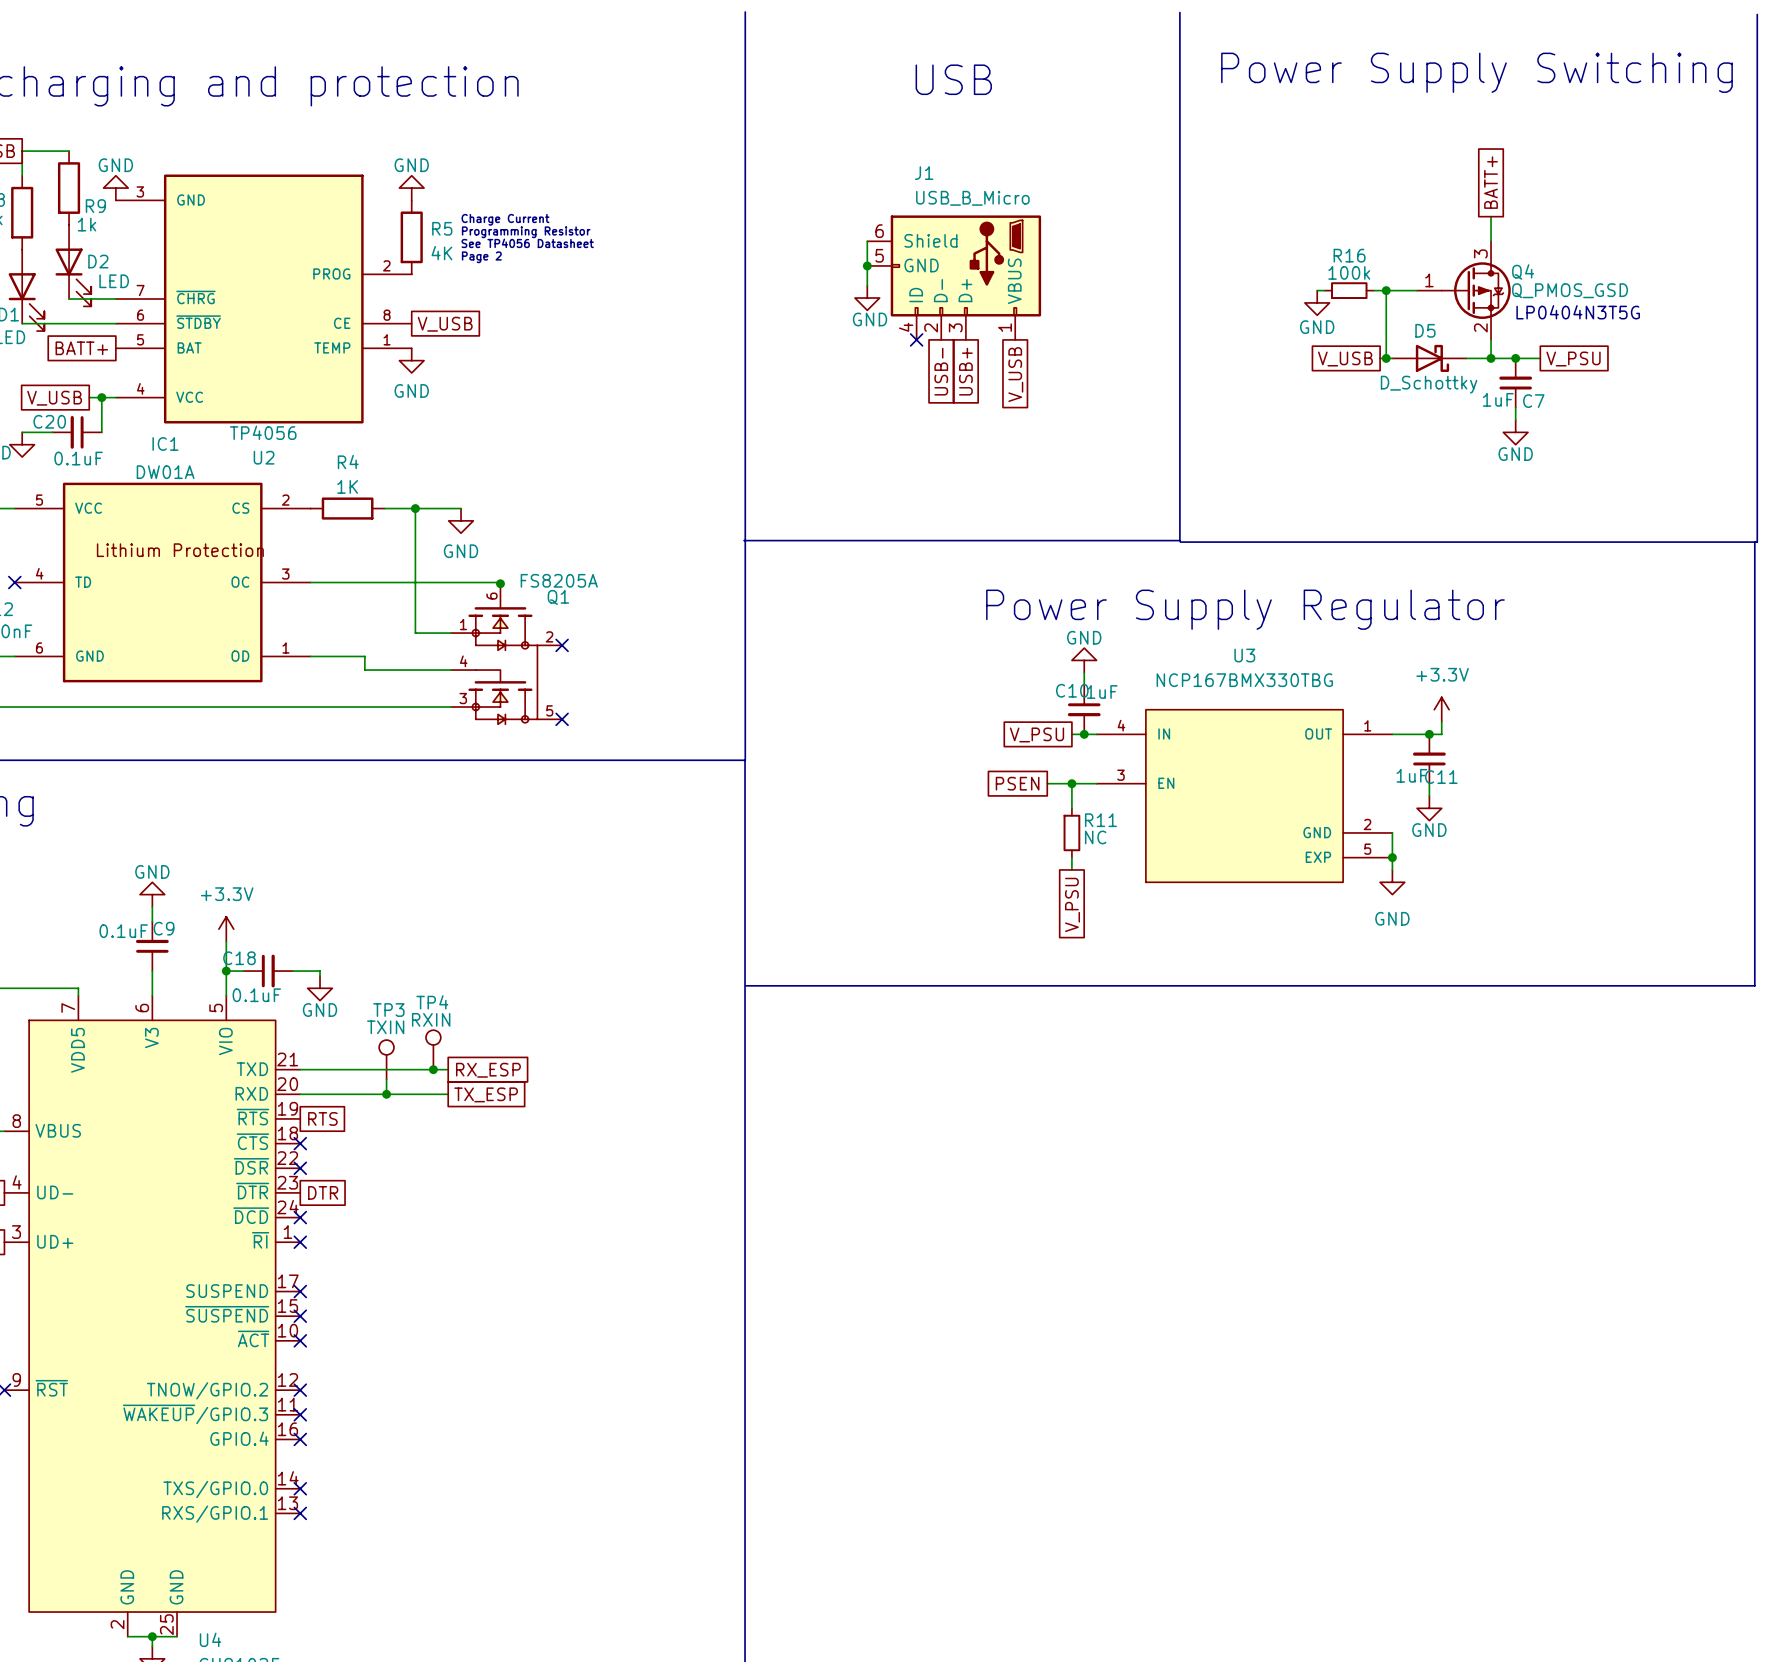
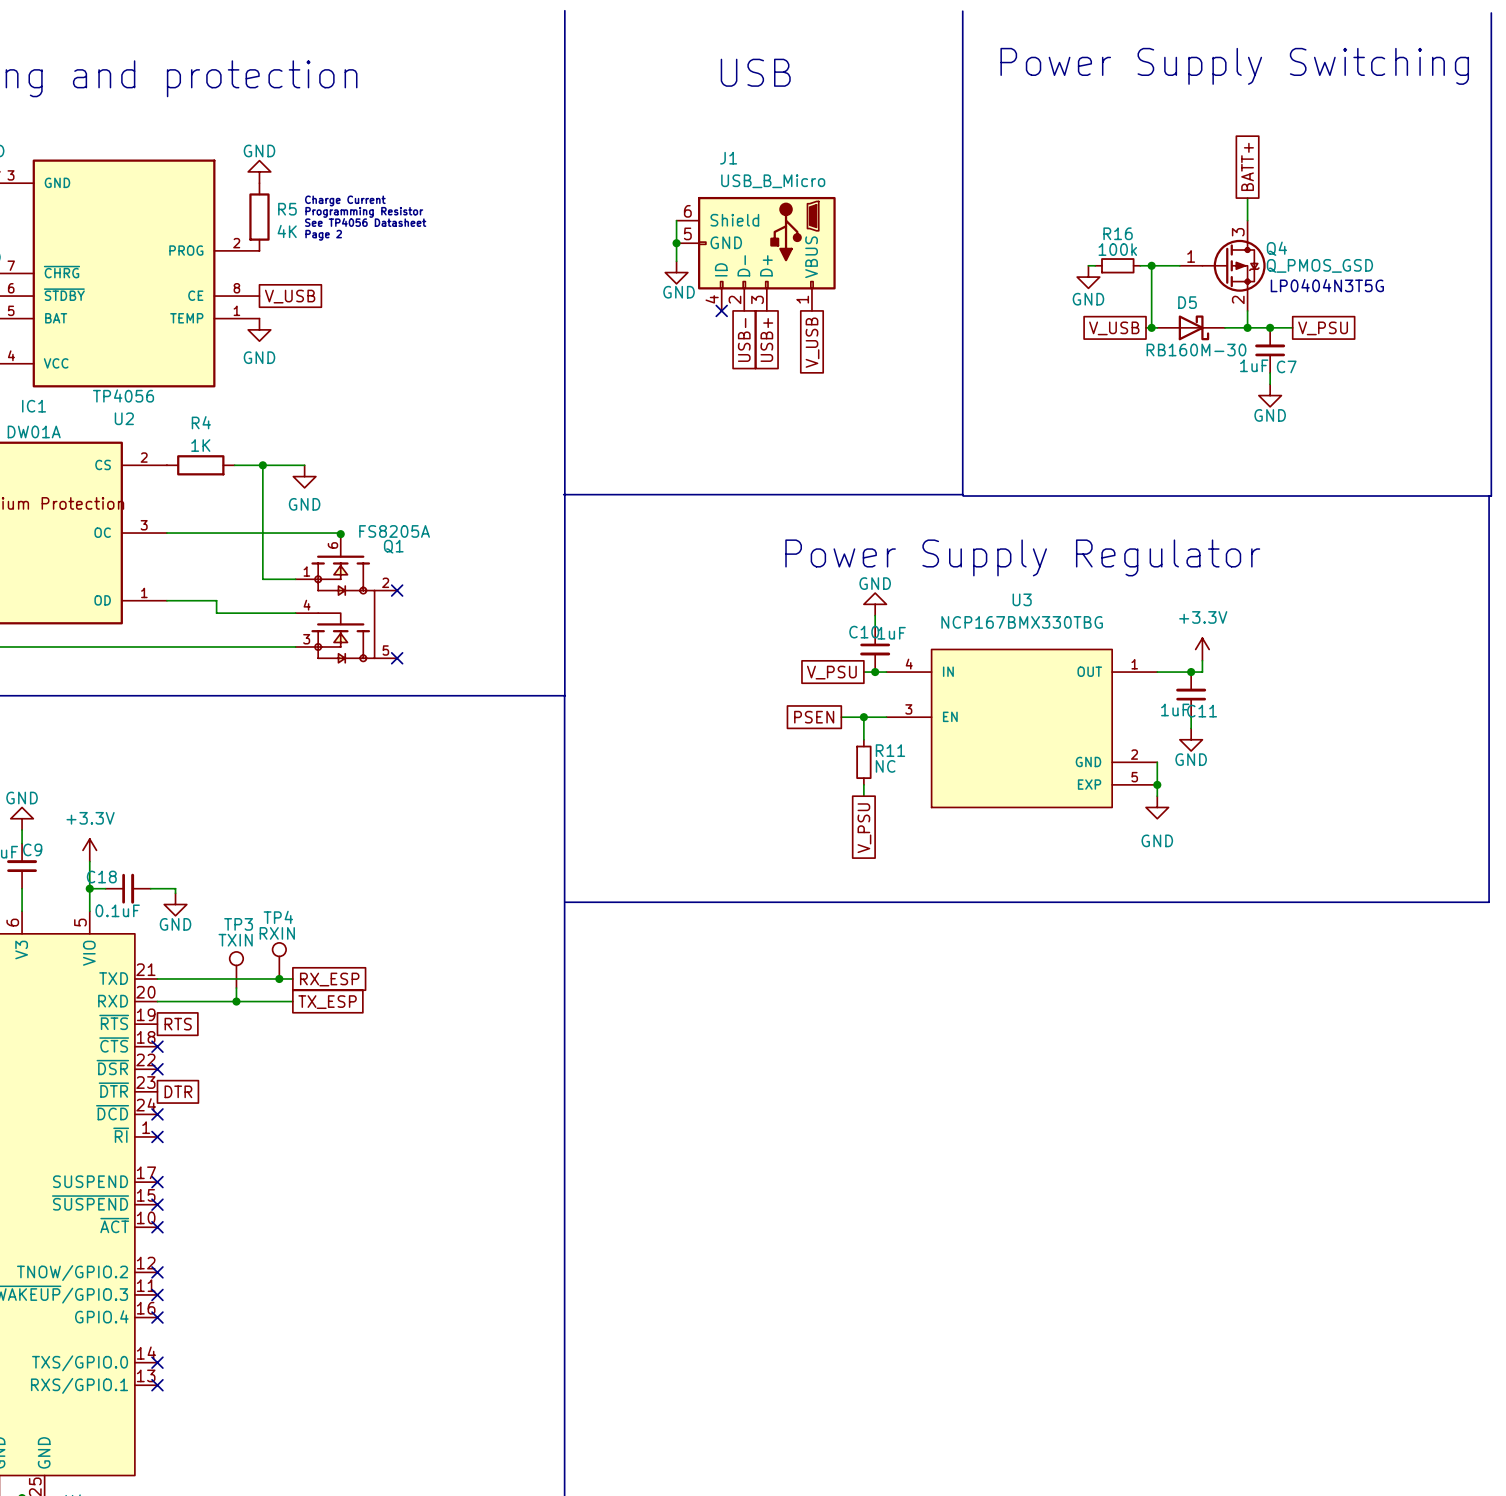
D5 value: D_Schottky (1429, 384) -> RB160M-30 (1196, 350)

